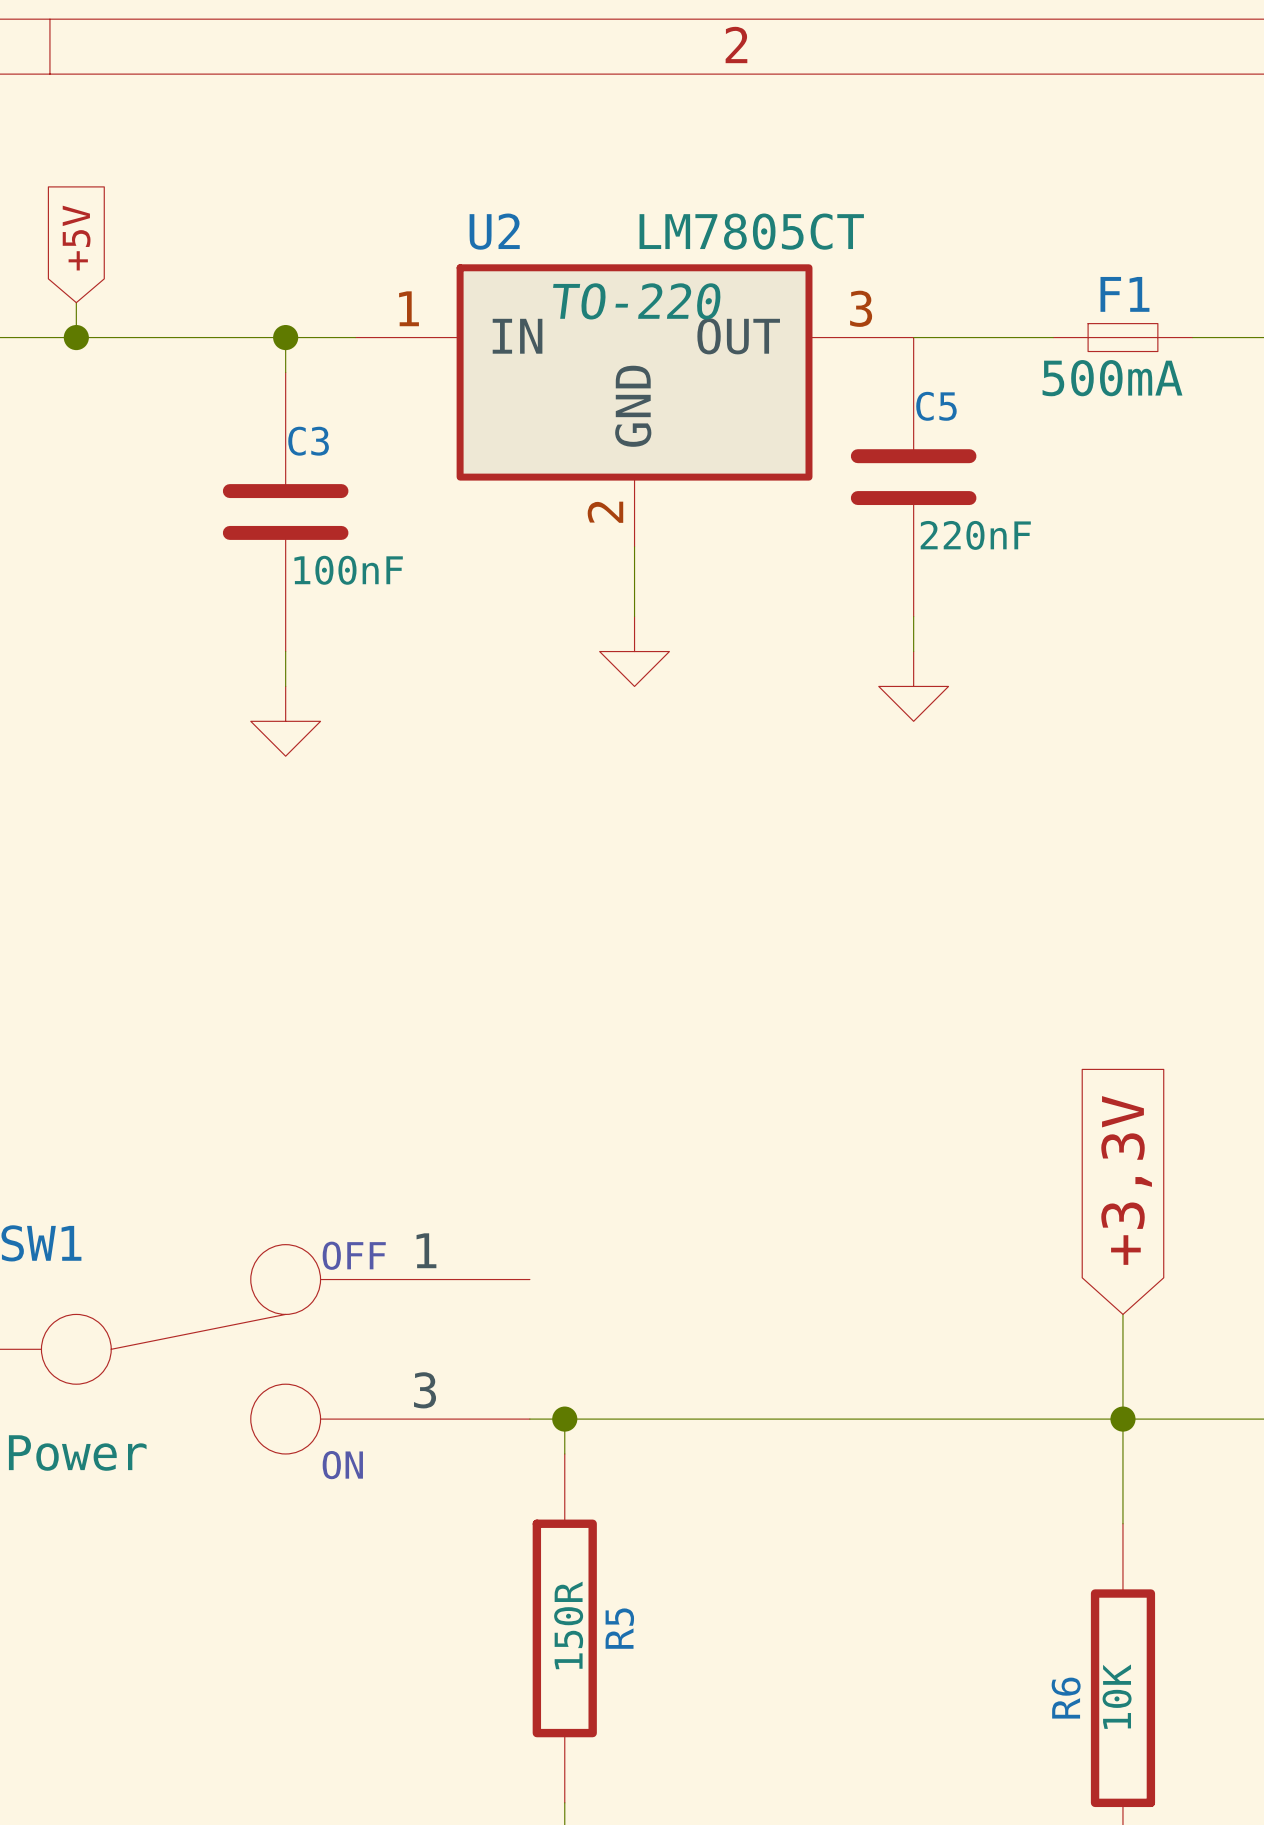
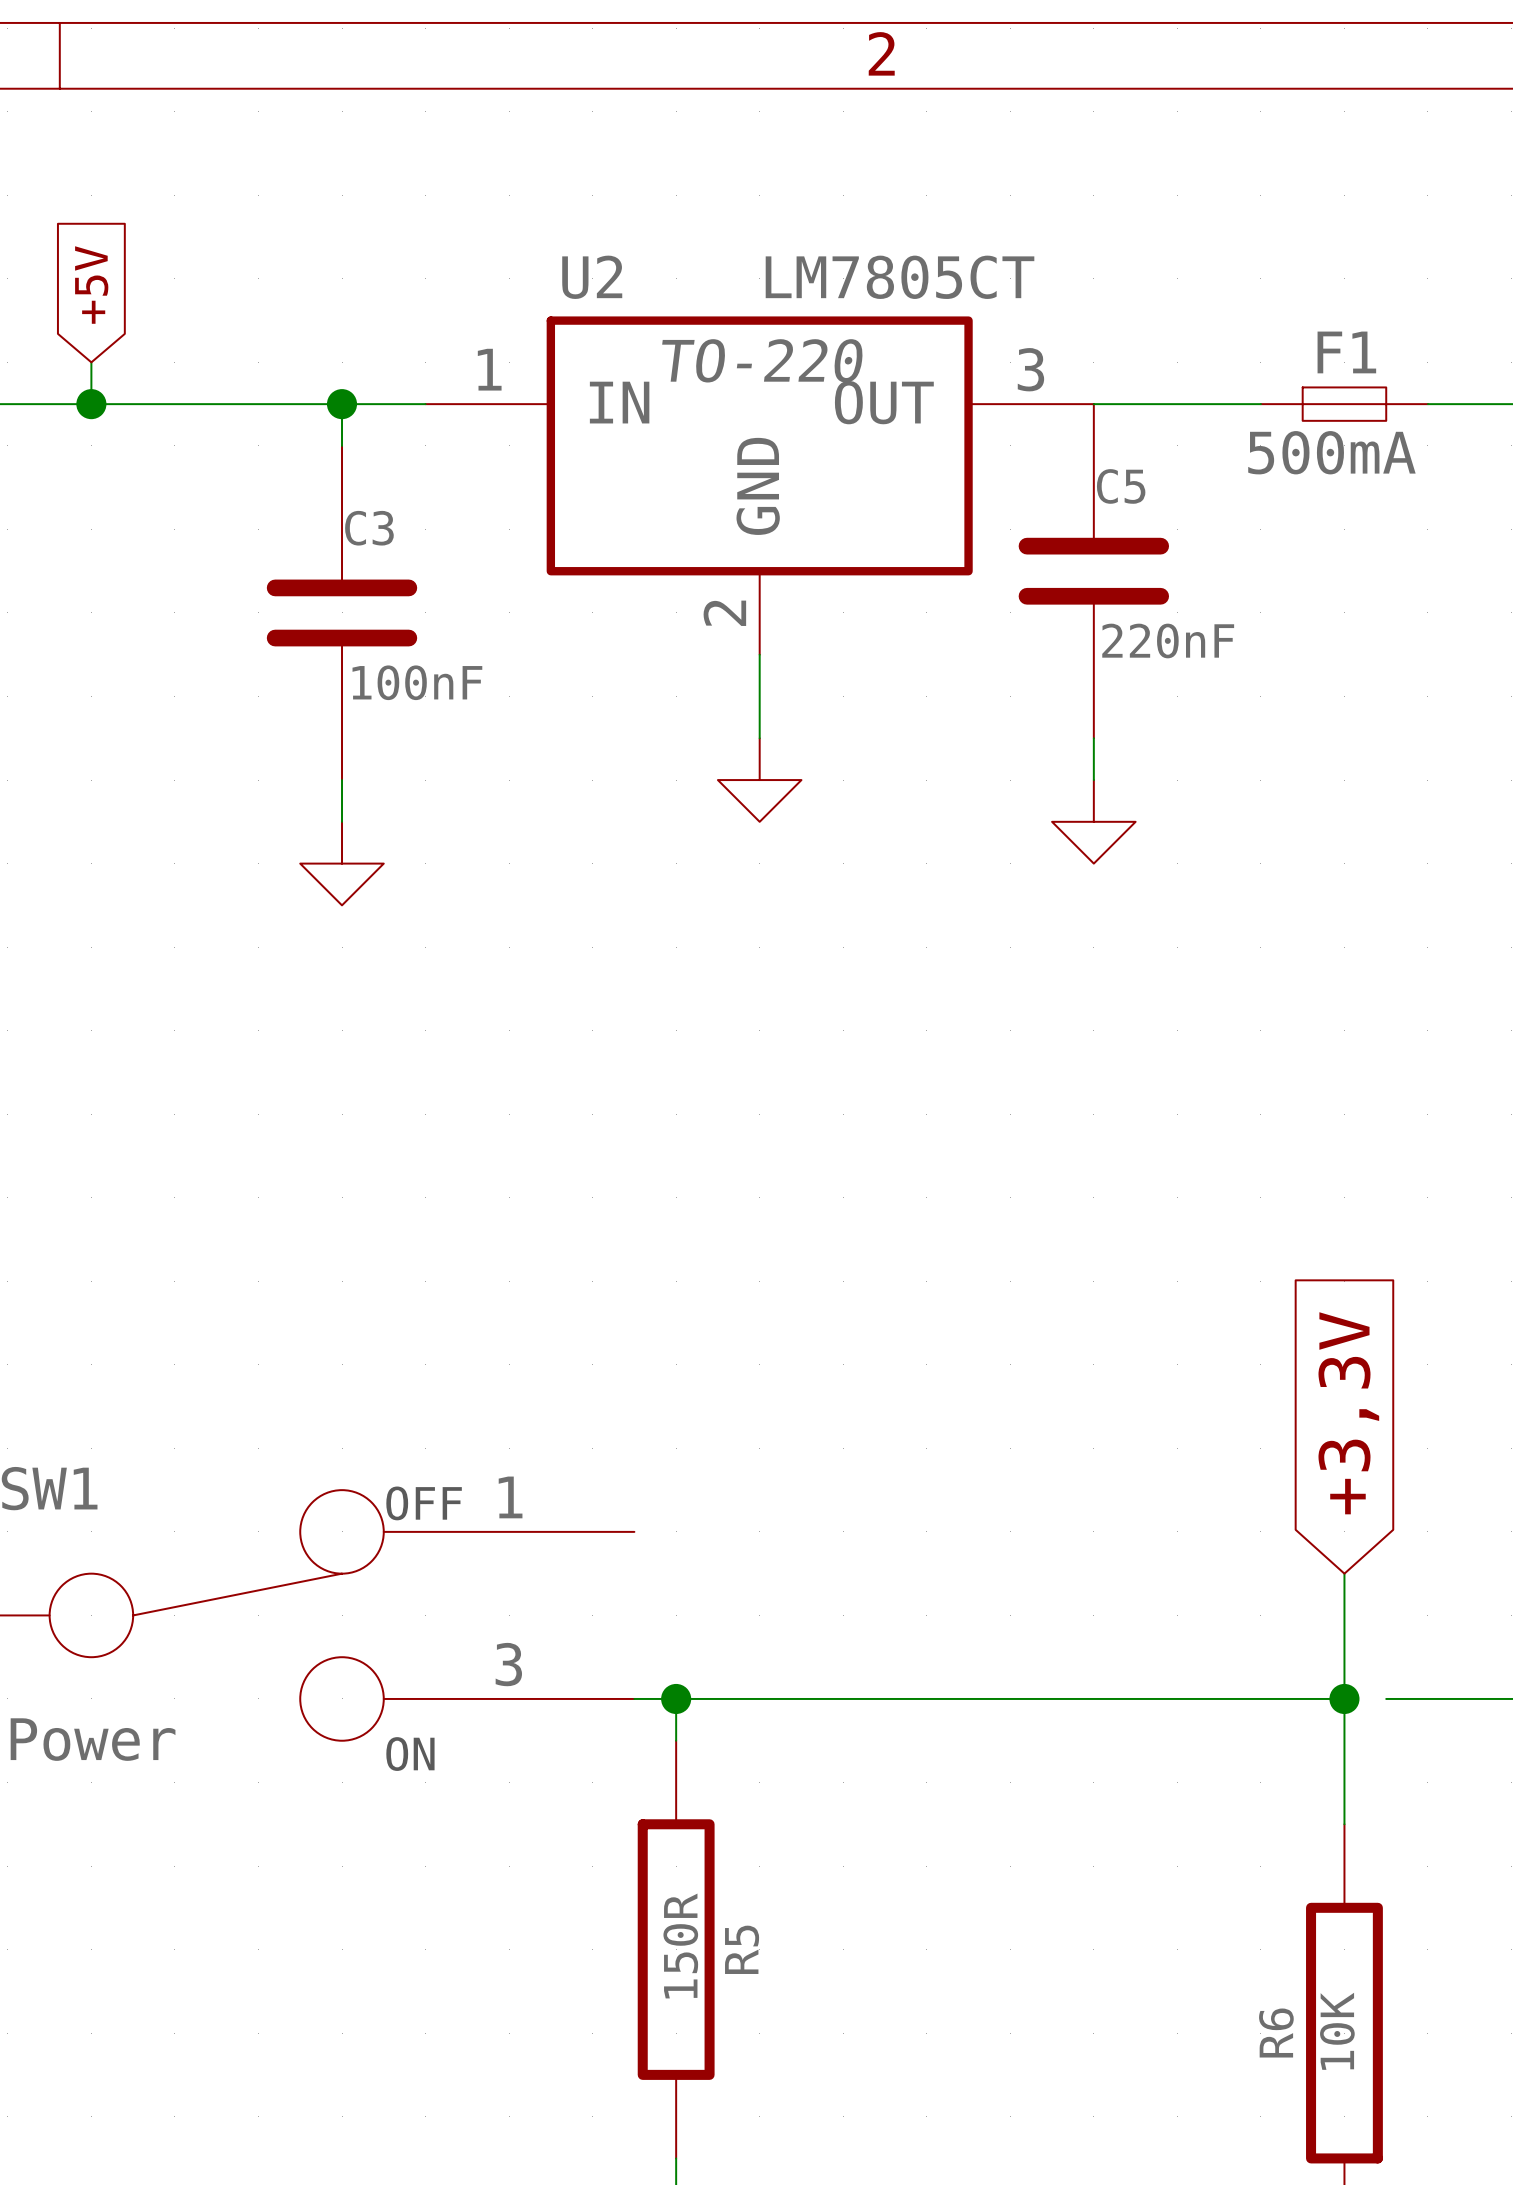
wire: (1122, 1419) (1157, 1419) -> none

